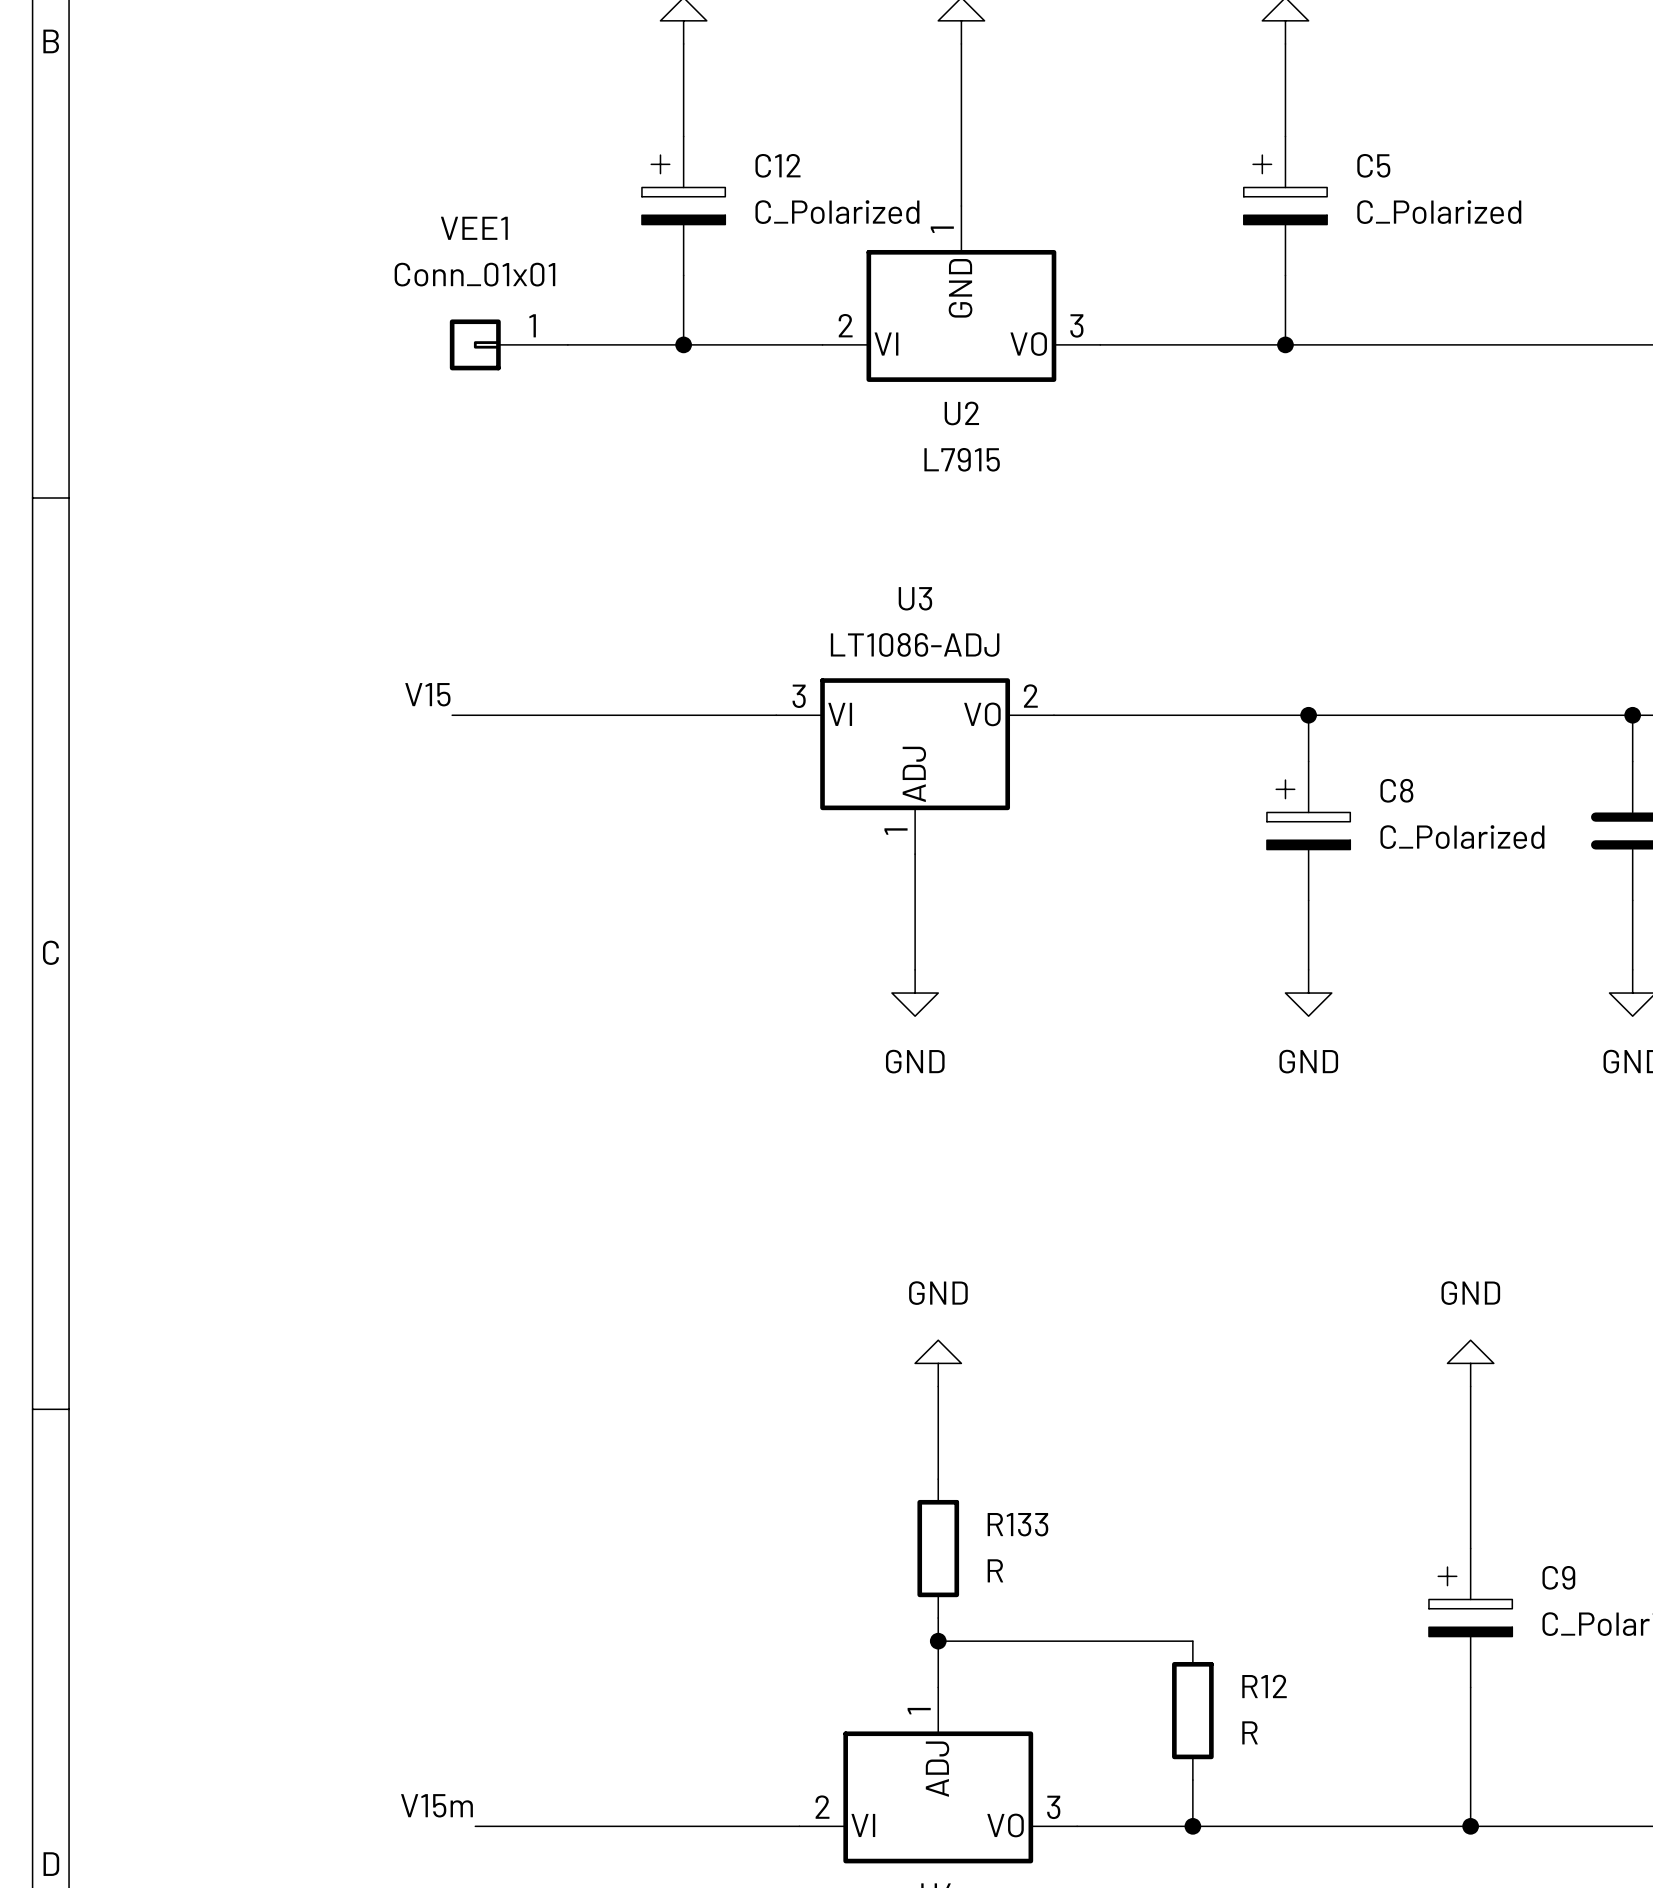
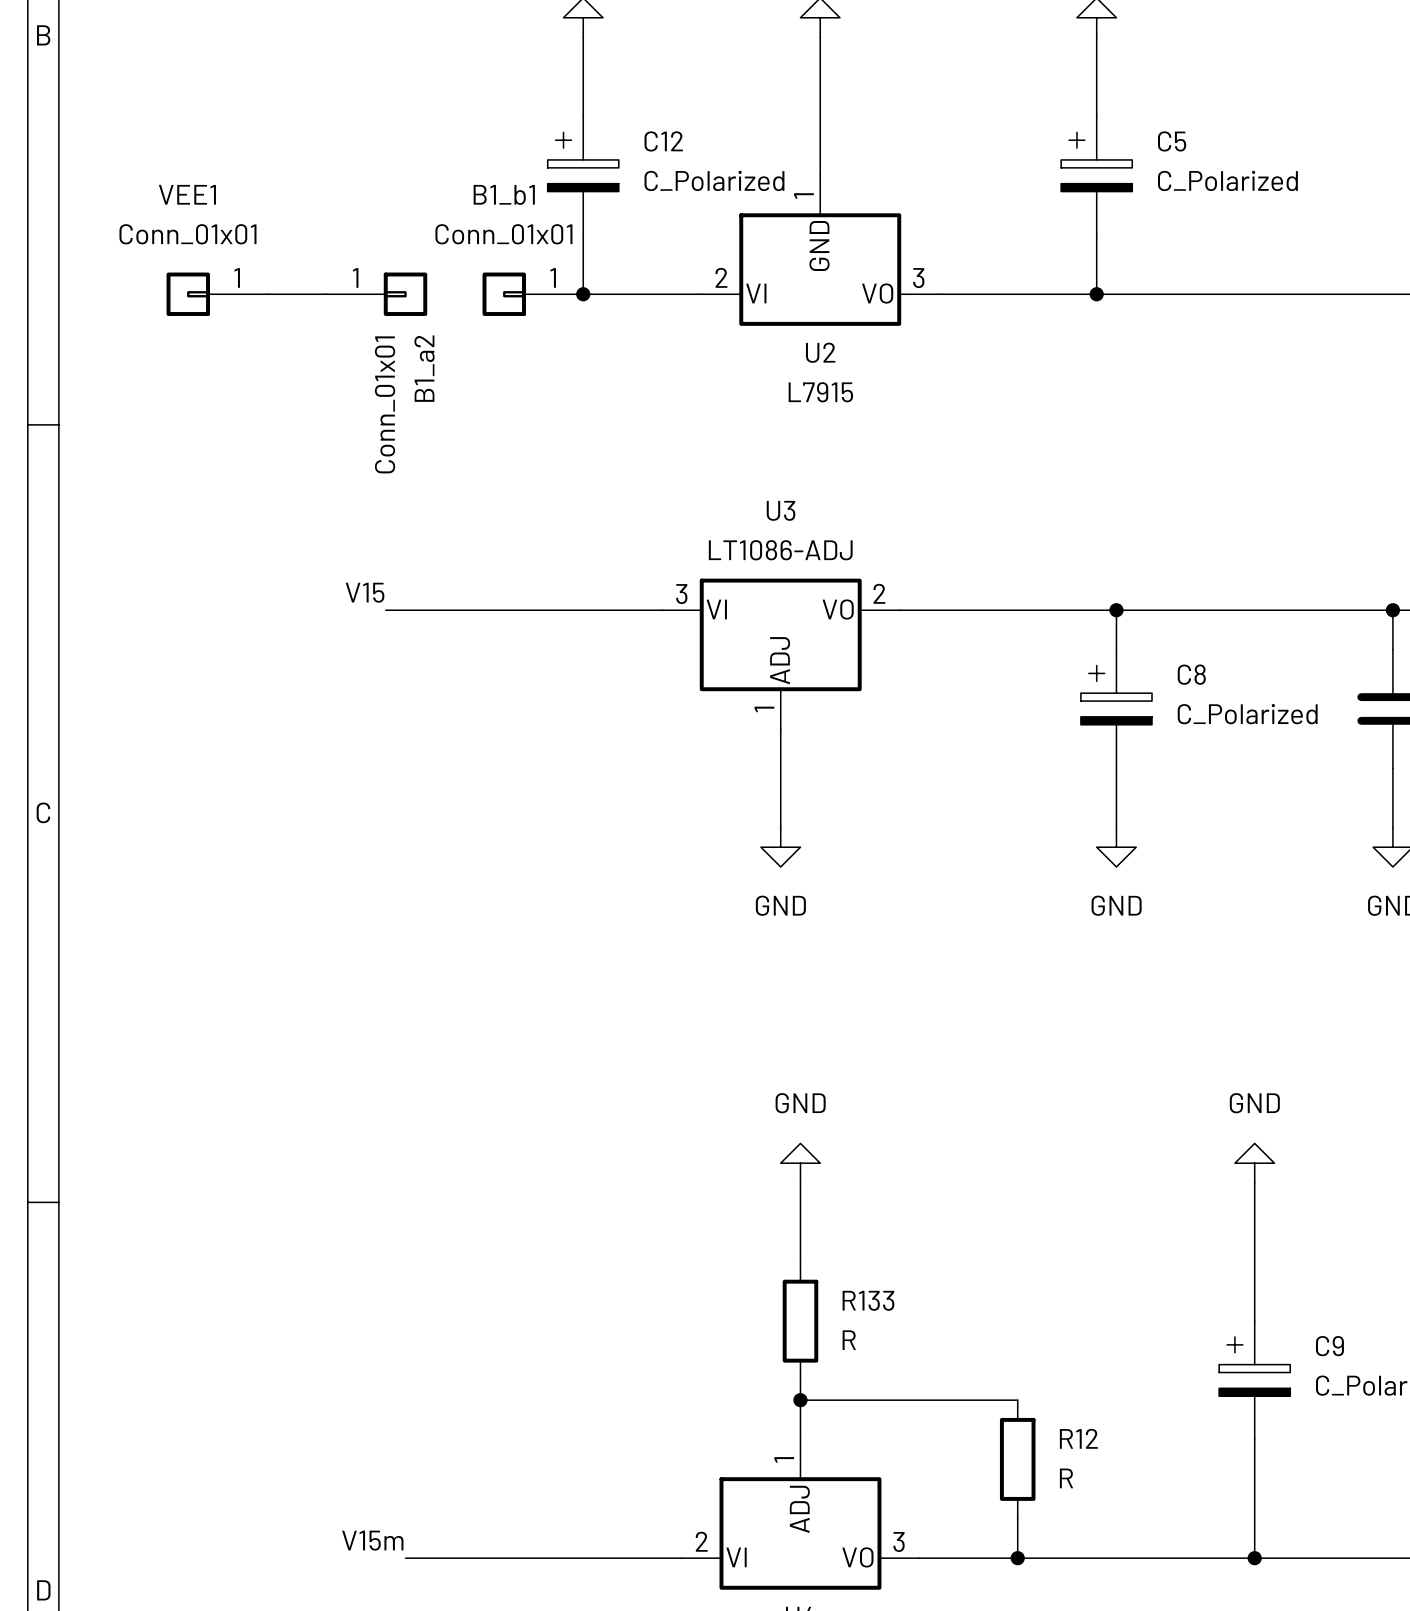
wire: none -> (267, 294) (326, 294)
B1_a2: none -> Conn_01x01 (376, 294)
VEE1 position: (508, 344) -> (216, 294)
B1_b1: none -> Conn_01x01 (532, 294)

